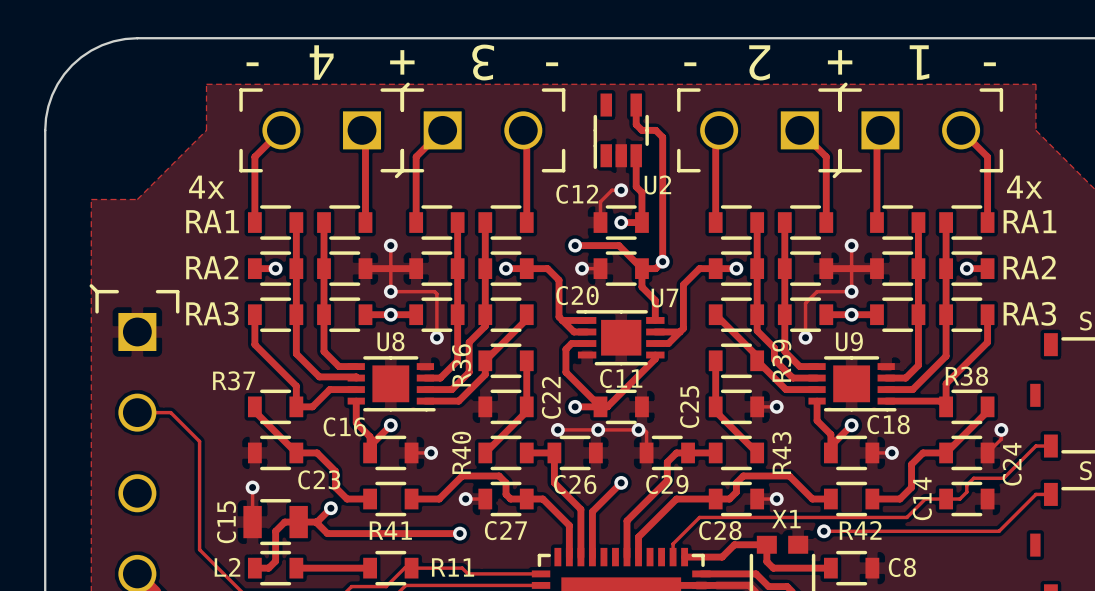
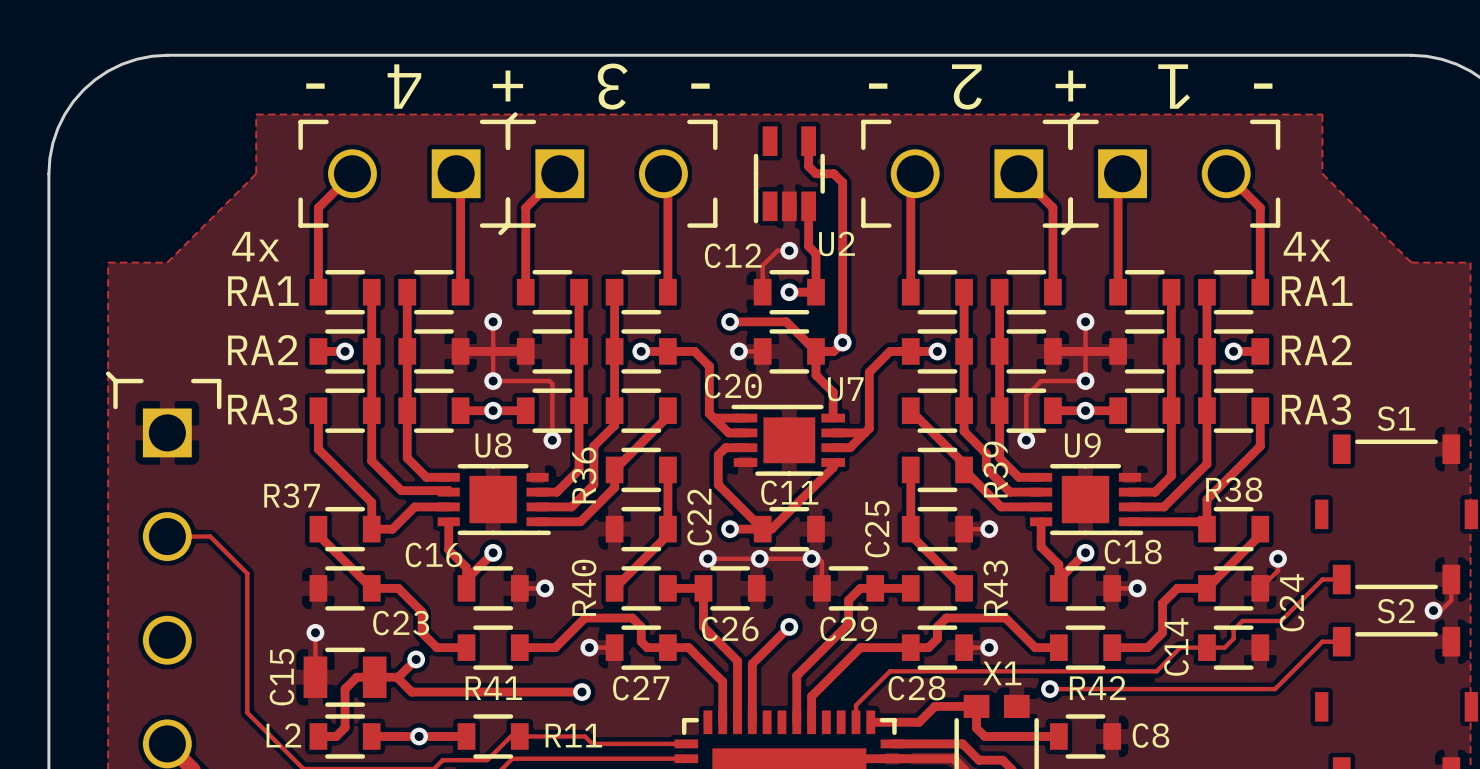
via: none -> (419, 736)

